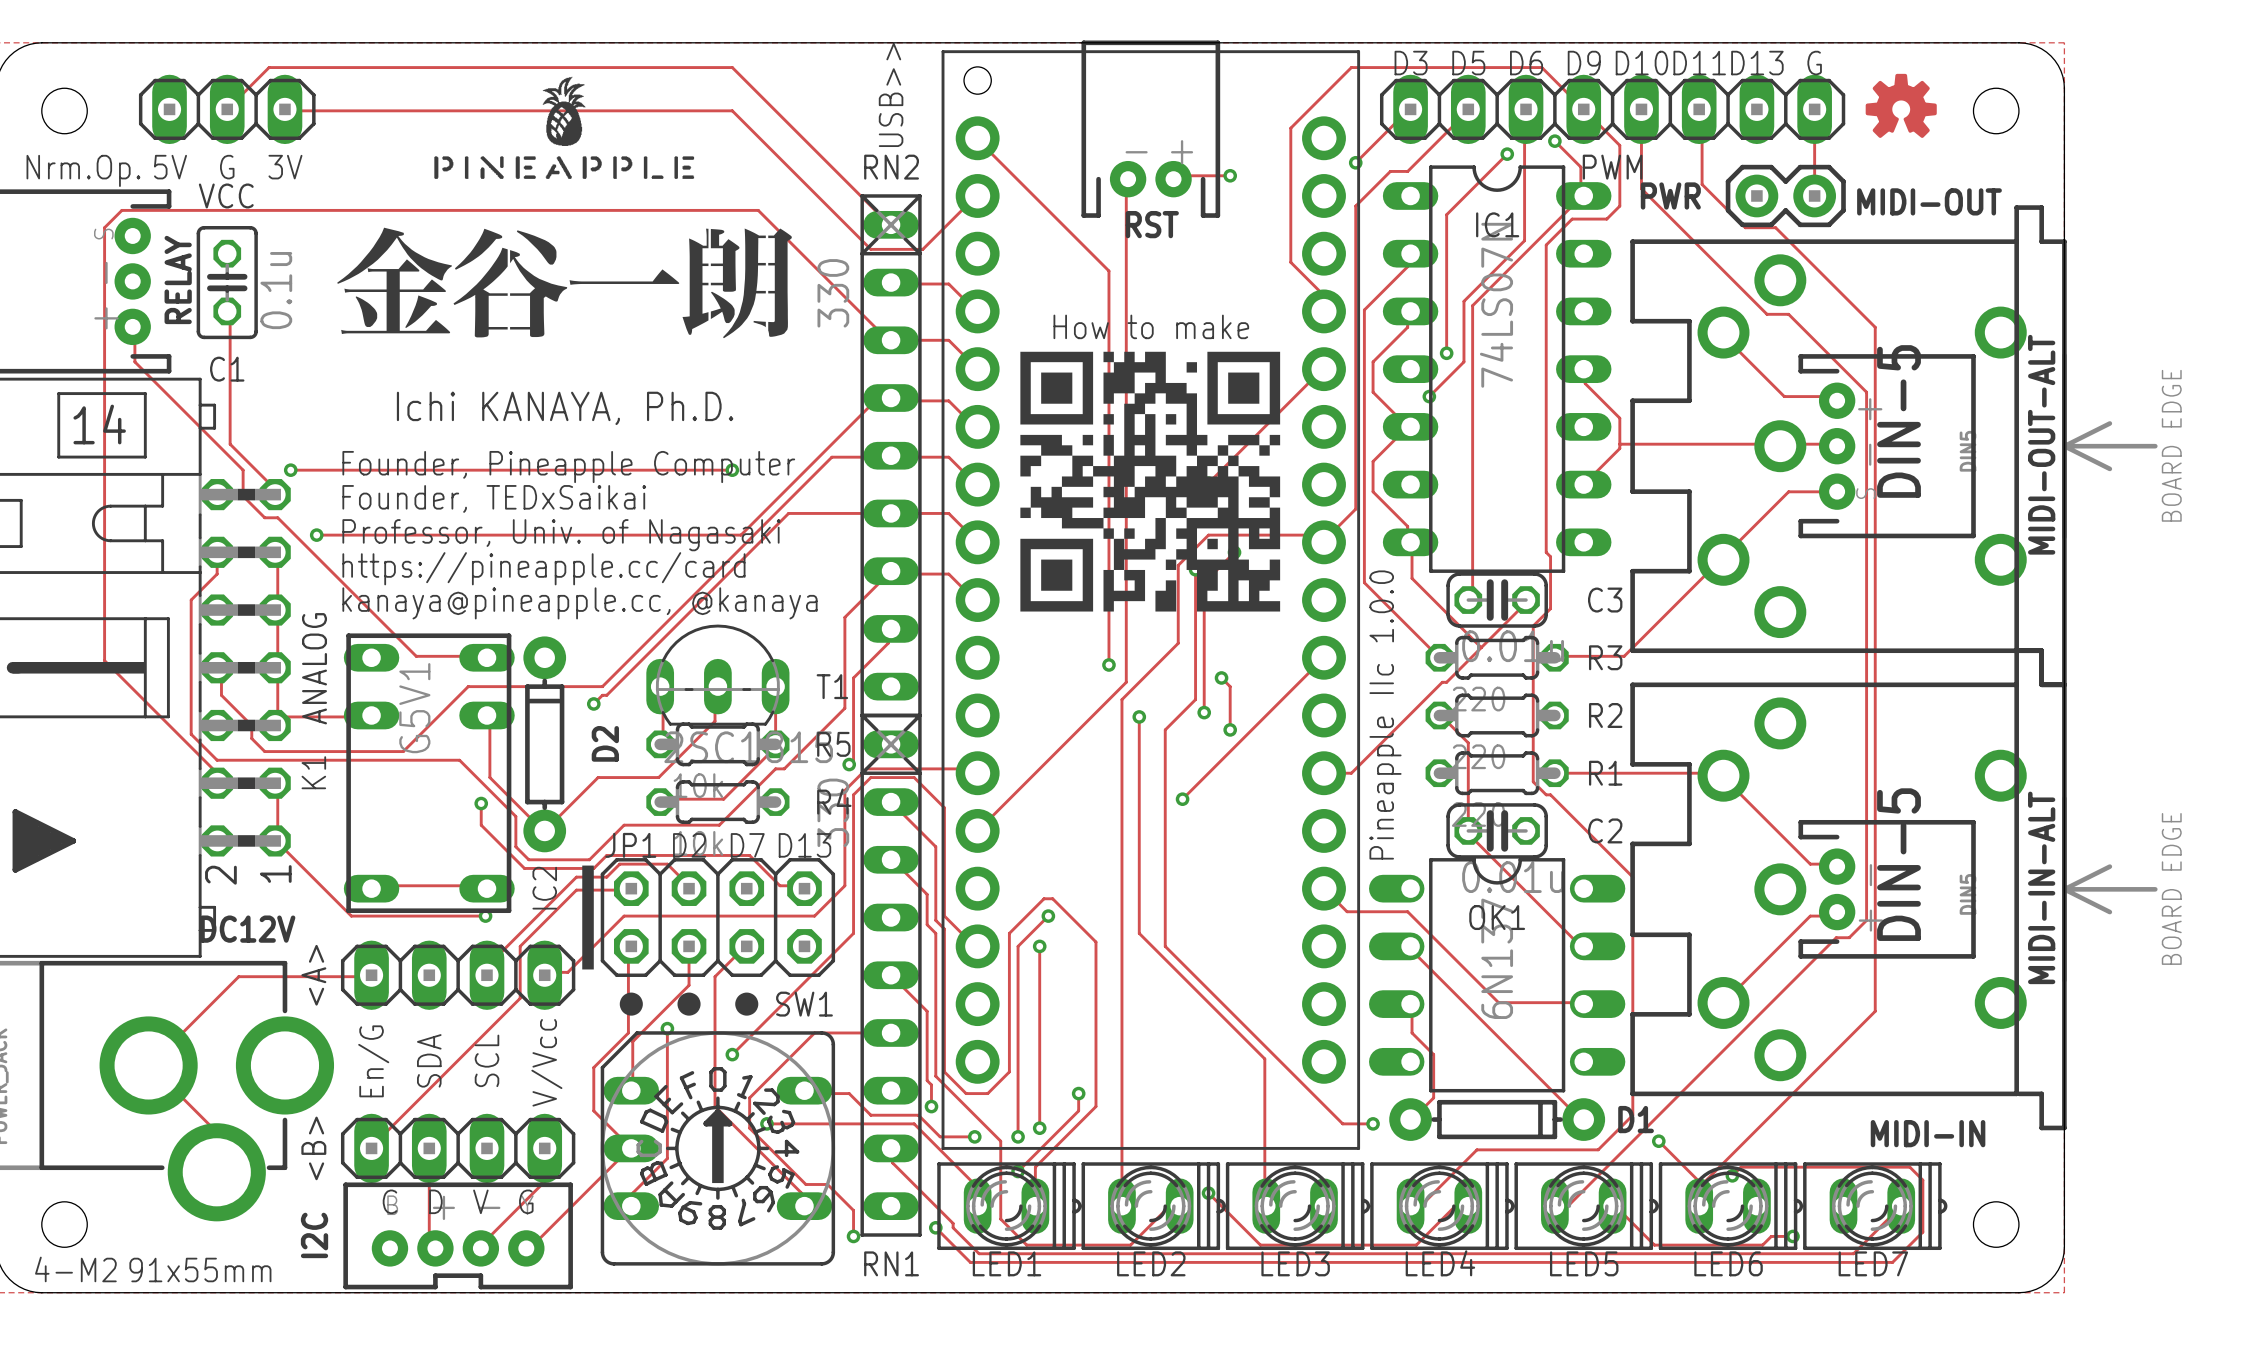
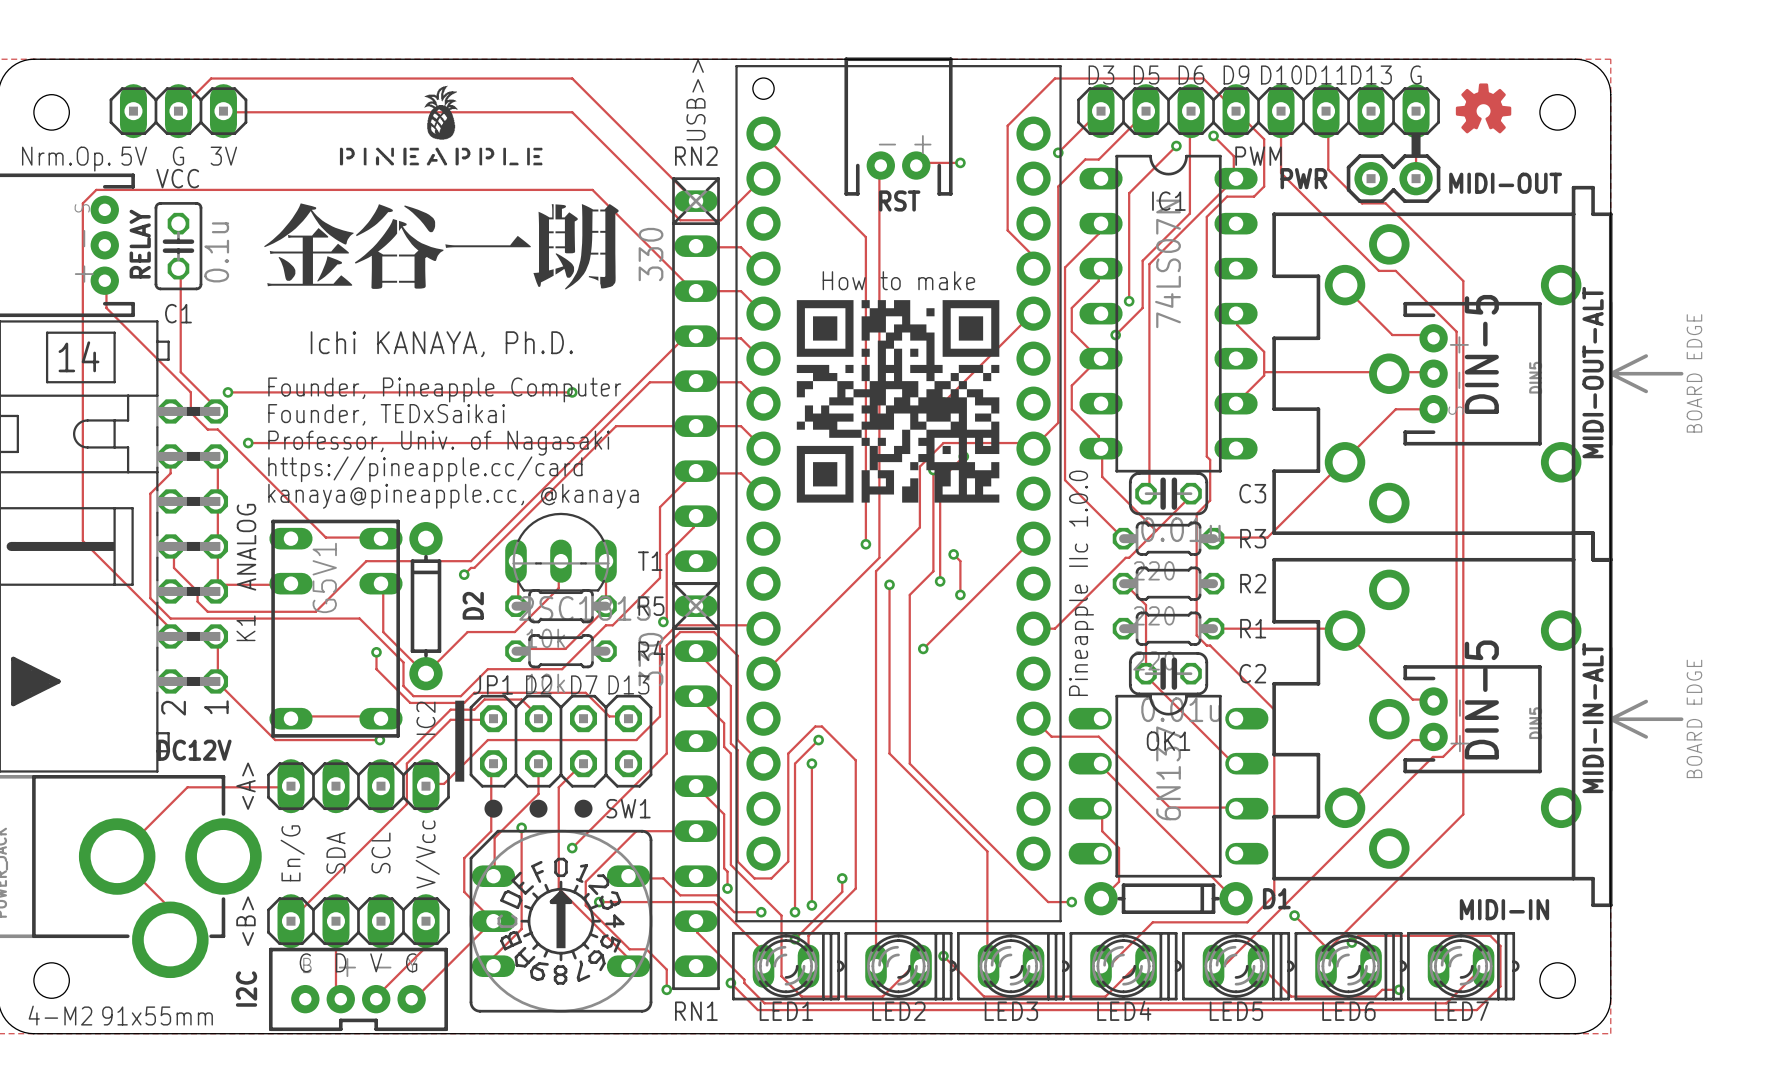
drawing: none -> [1411, 133, 1421, 157]

